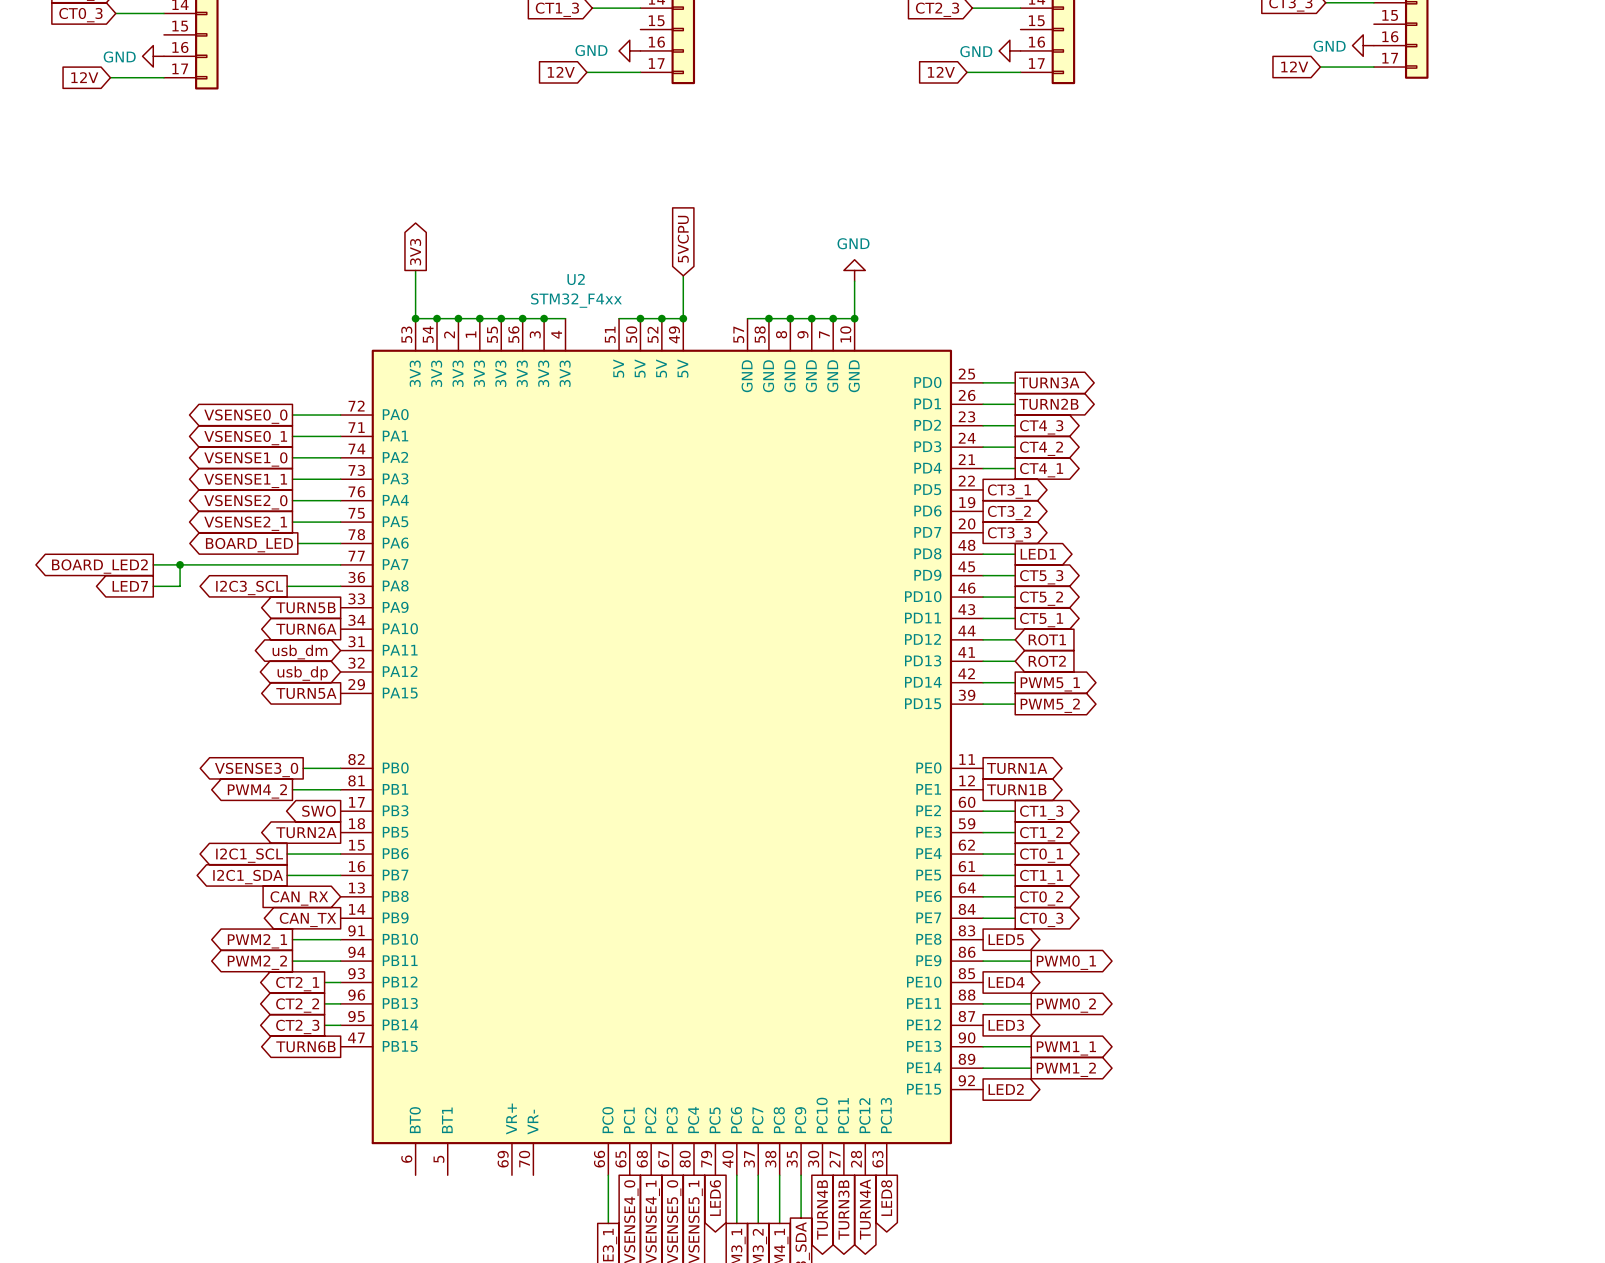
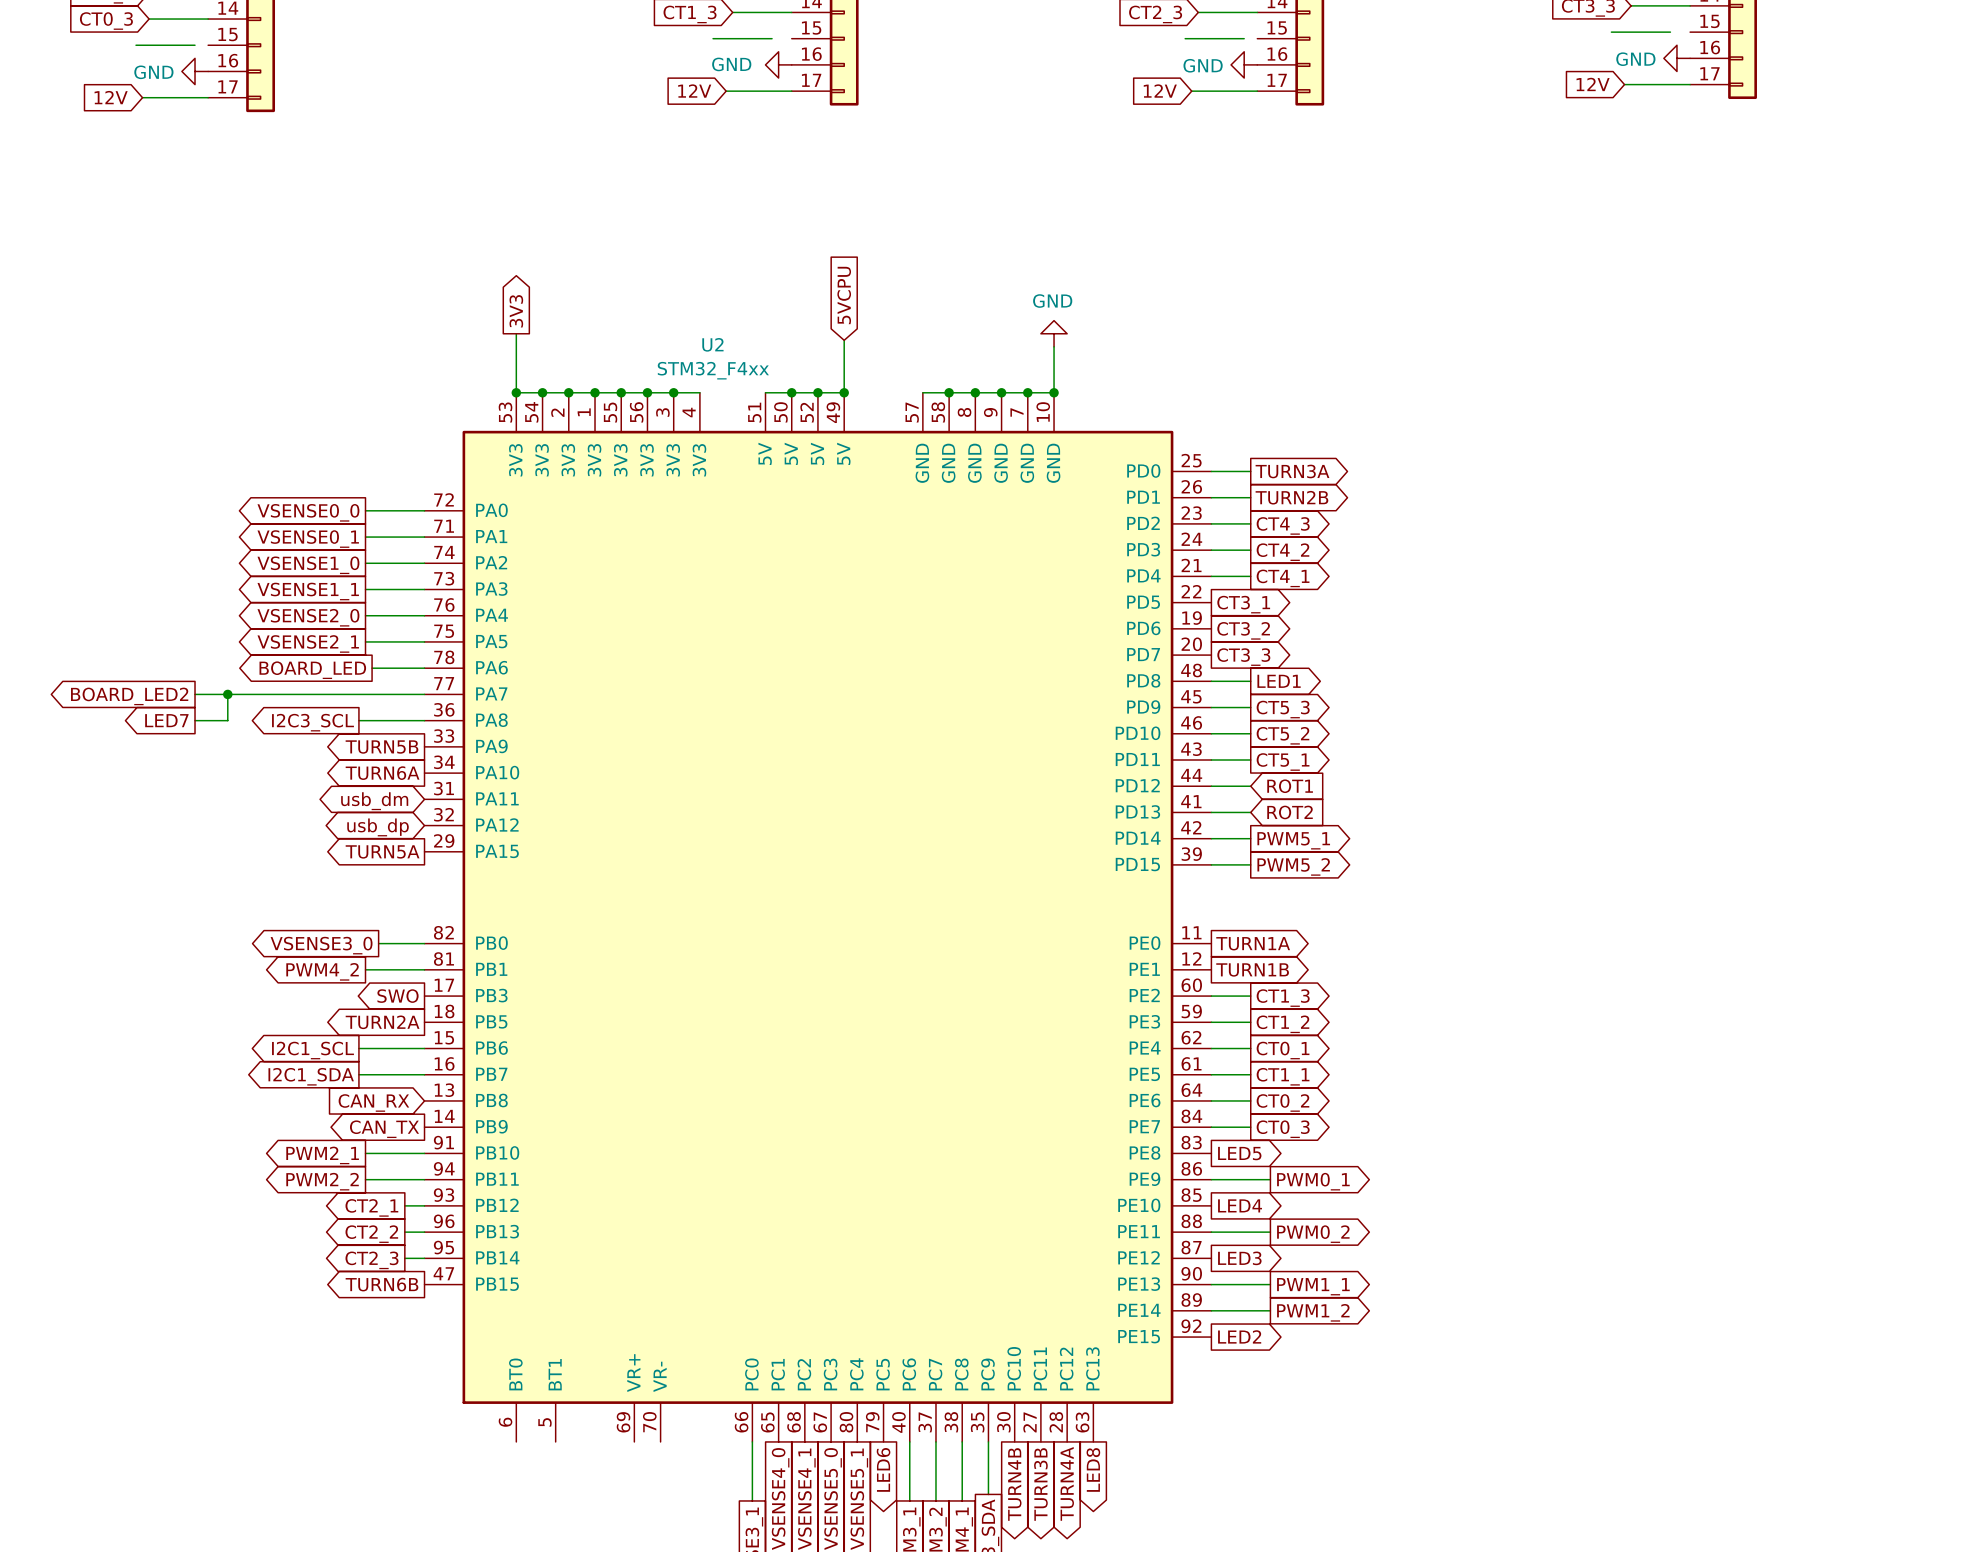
wire: none -> (1611, 32) (1670, 32)
wire: none -> (713, 38) (772, 38)
wire: none -> (1185, 38) (1244, 38)
wire: none -> (135, 45) (195, 45)

